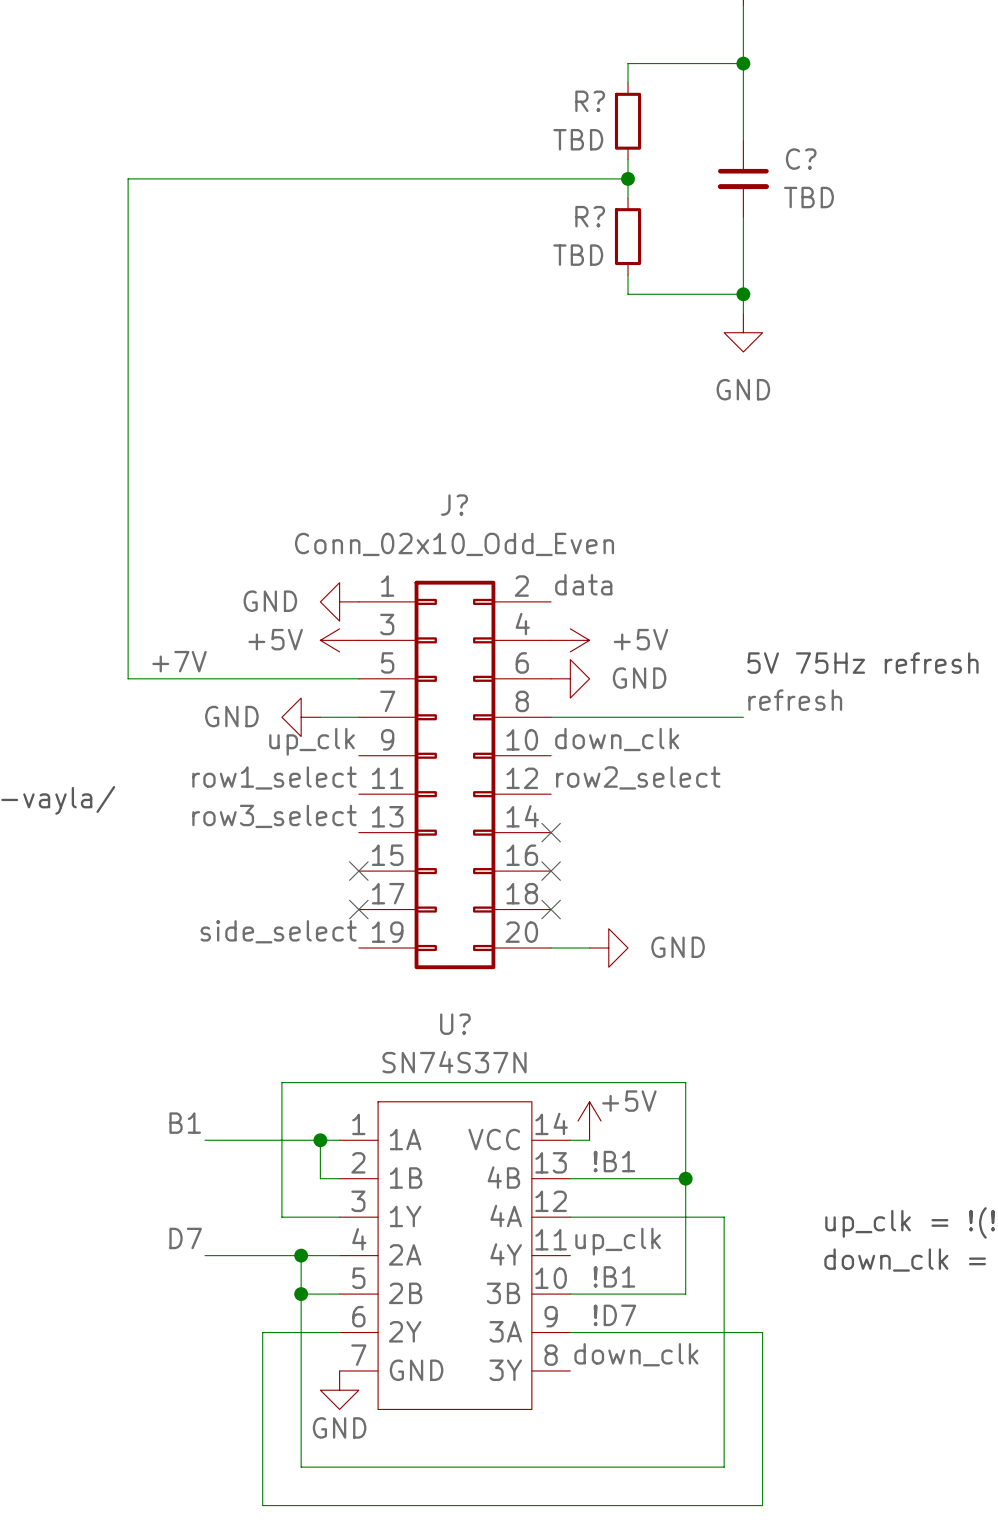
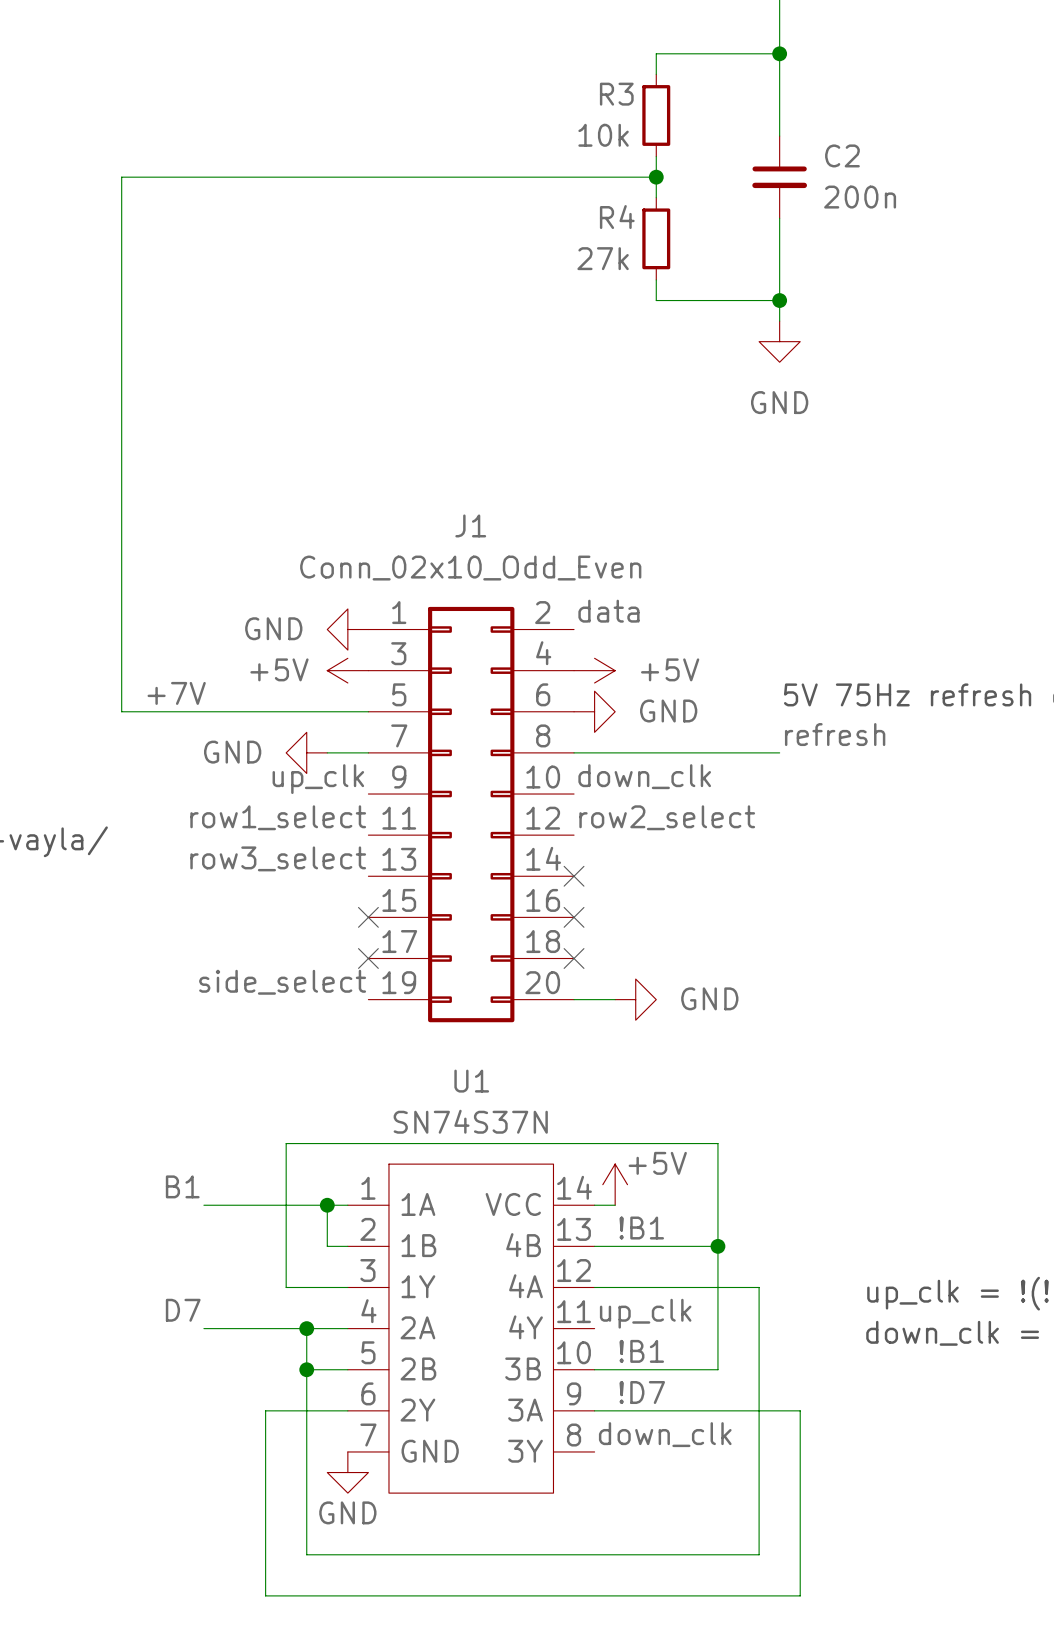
R? name: R? (590, 101) -> R3 (616, 94)
R? value: TBD (578, 139) -> 10k (603, 135)
C? name: C? (801, 159) -> C2 (842, 155)
C? value: TBD (808, 197) -> 200n (860, 197)
R? name: R? (590, 216) -> R4 (617, 217)
R? value: TBD (578, 255) -> 27k (603, 258)
J? name: J? (454, 505) -> J1 (470, 525)
U? name: U? (455, 1024) -> U1 (471, 1081)

